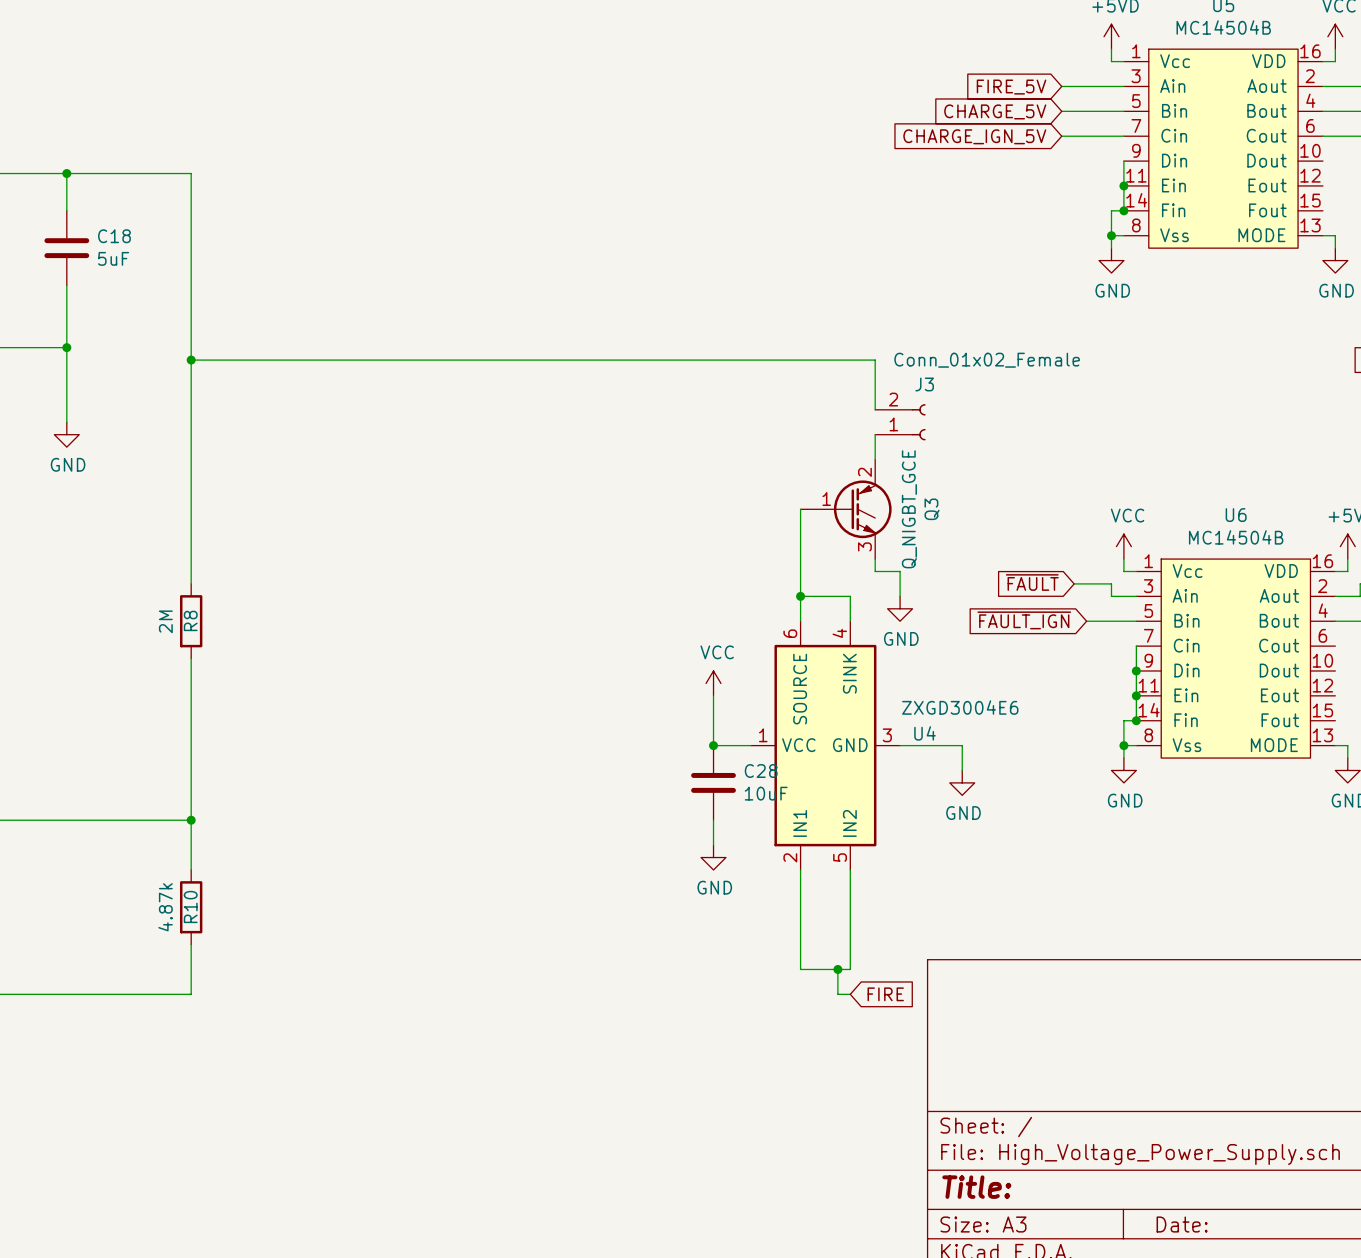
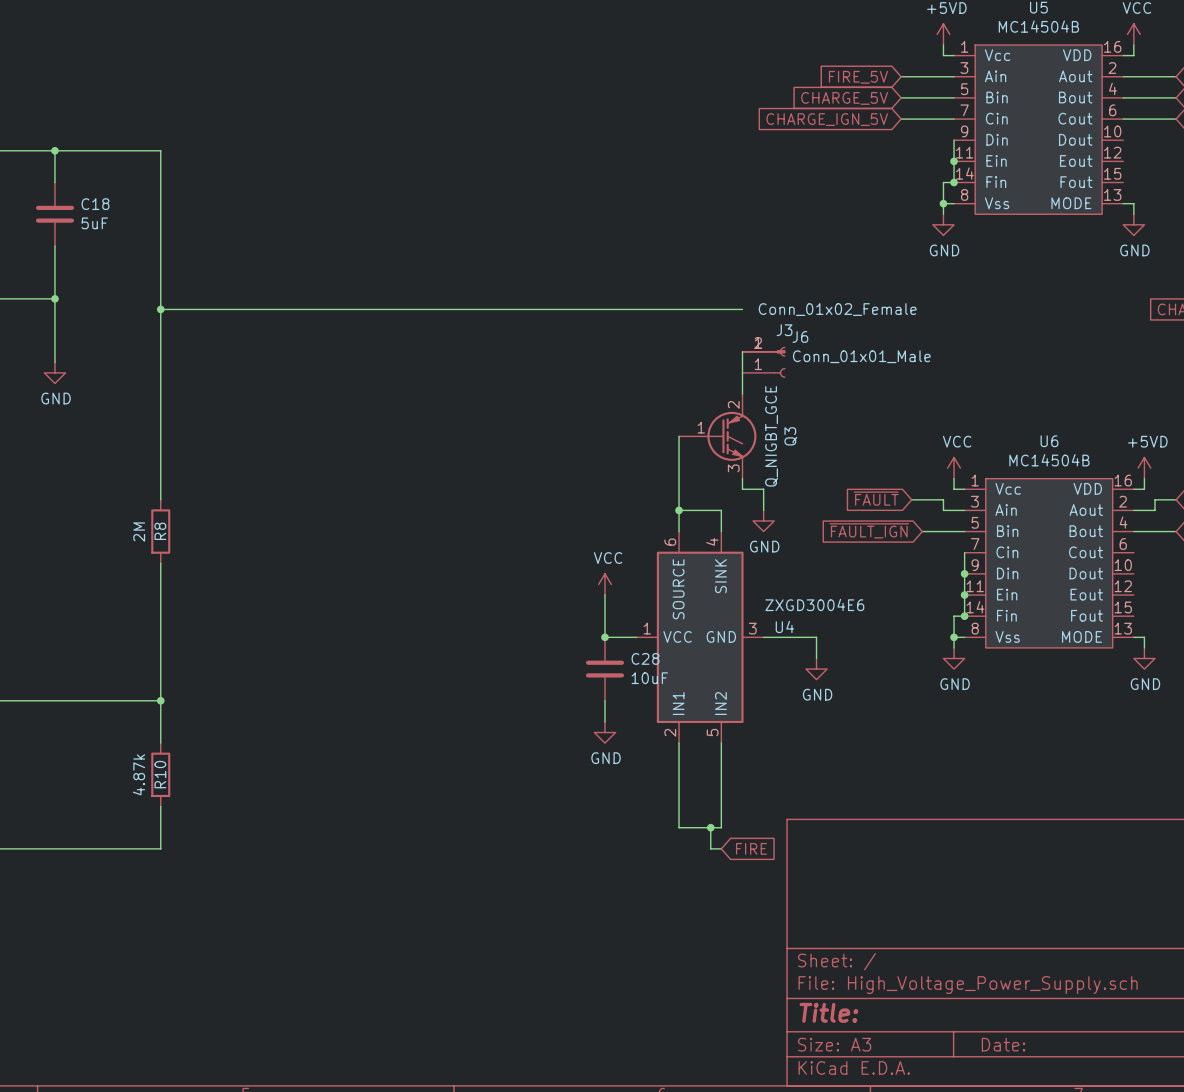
wire: (875, 360) (875, 409) -> (742, 372) (742, 351)
J6: none -> Conn_01x01_Male (763, 351)

